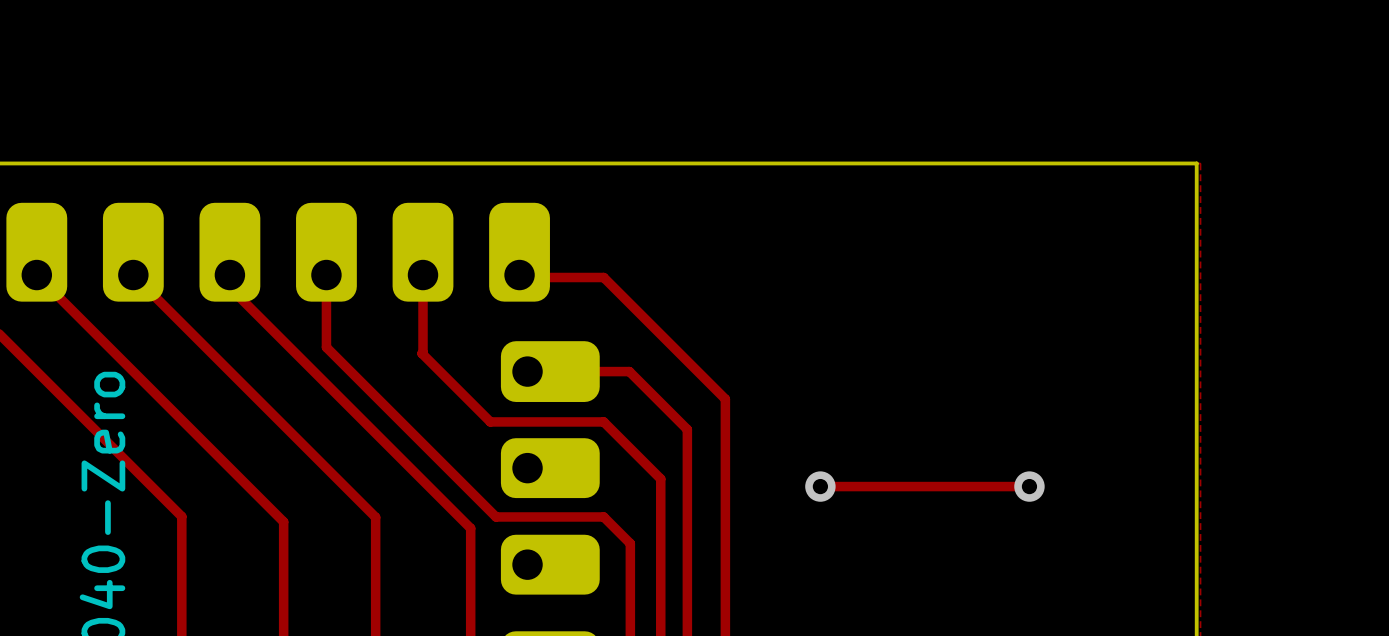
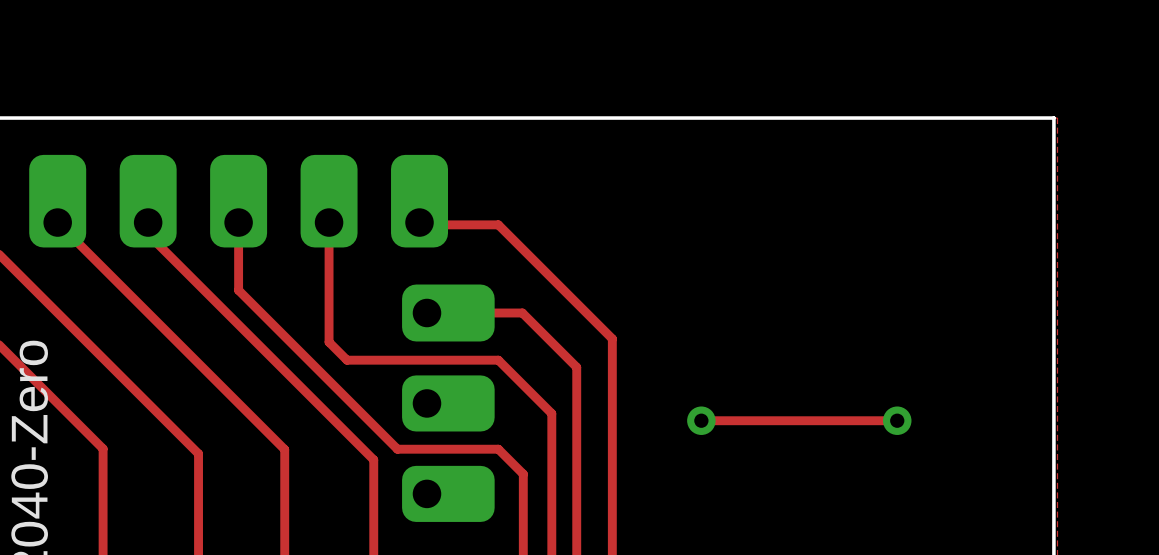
track: (422, 352) (490, 421) -> (329, 295) (329, 342) (347, 360) (392, 360)

